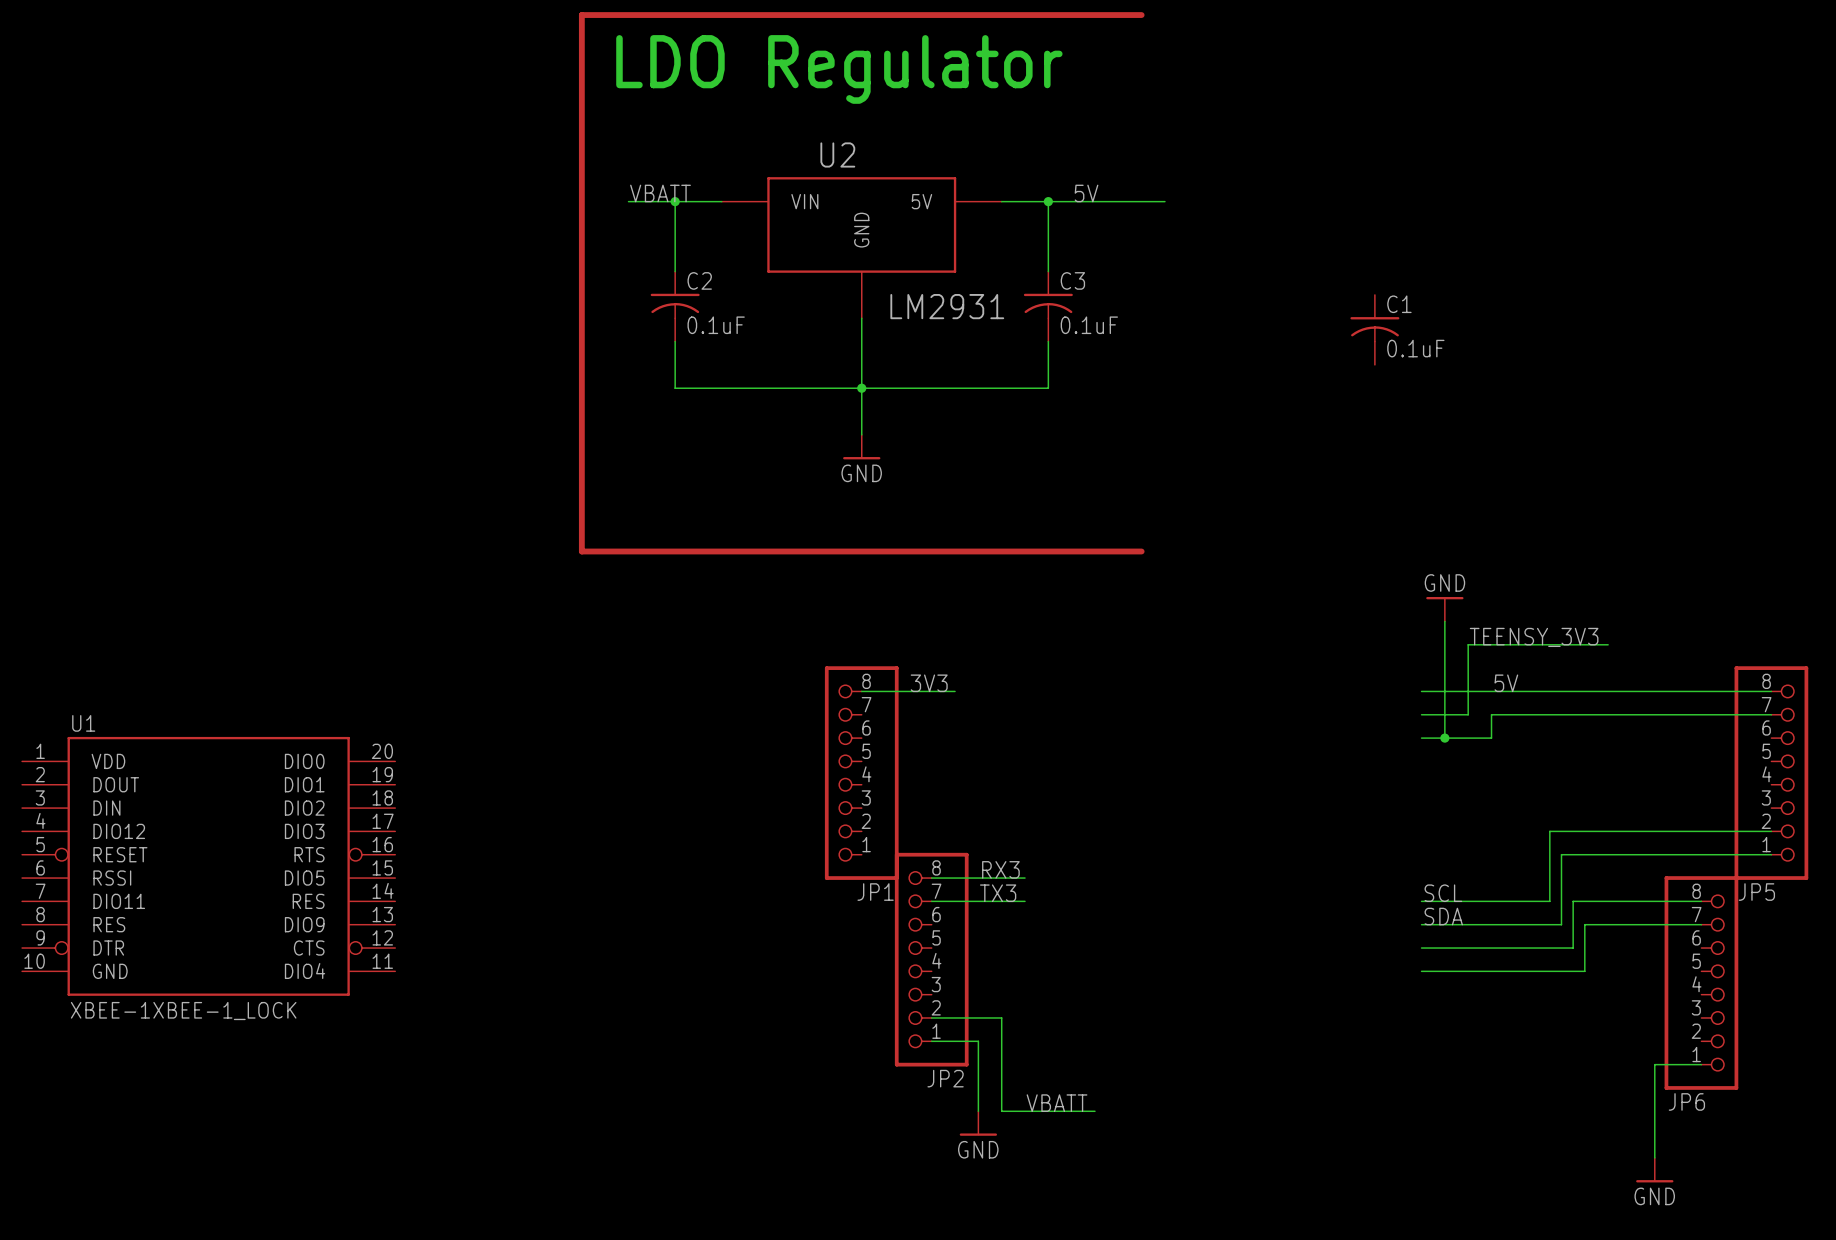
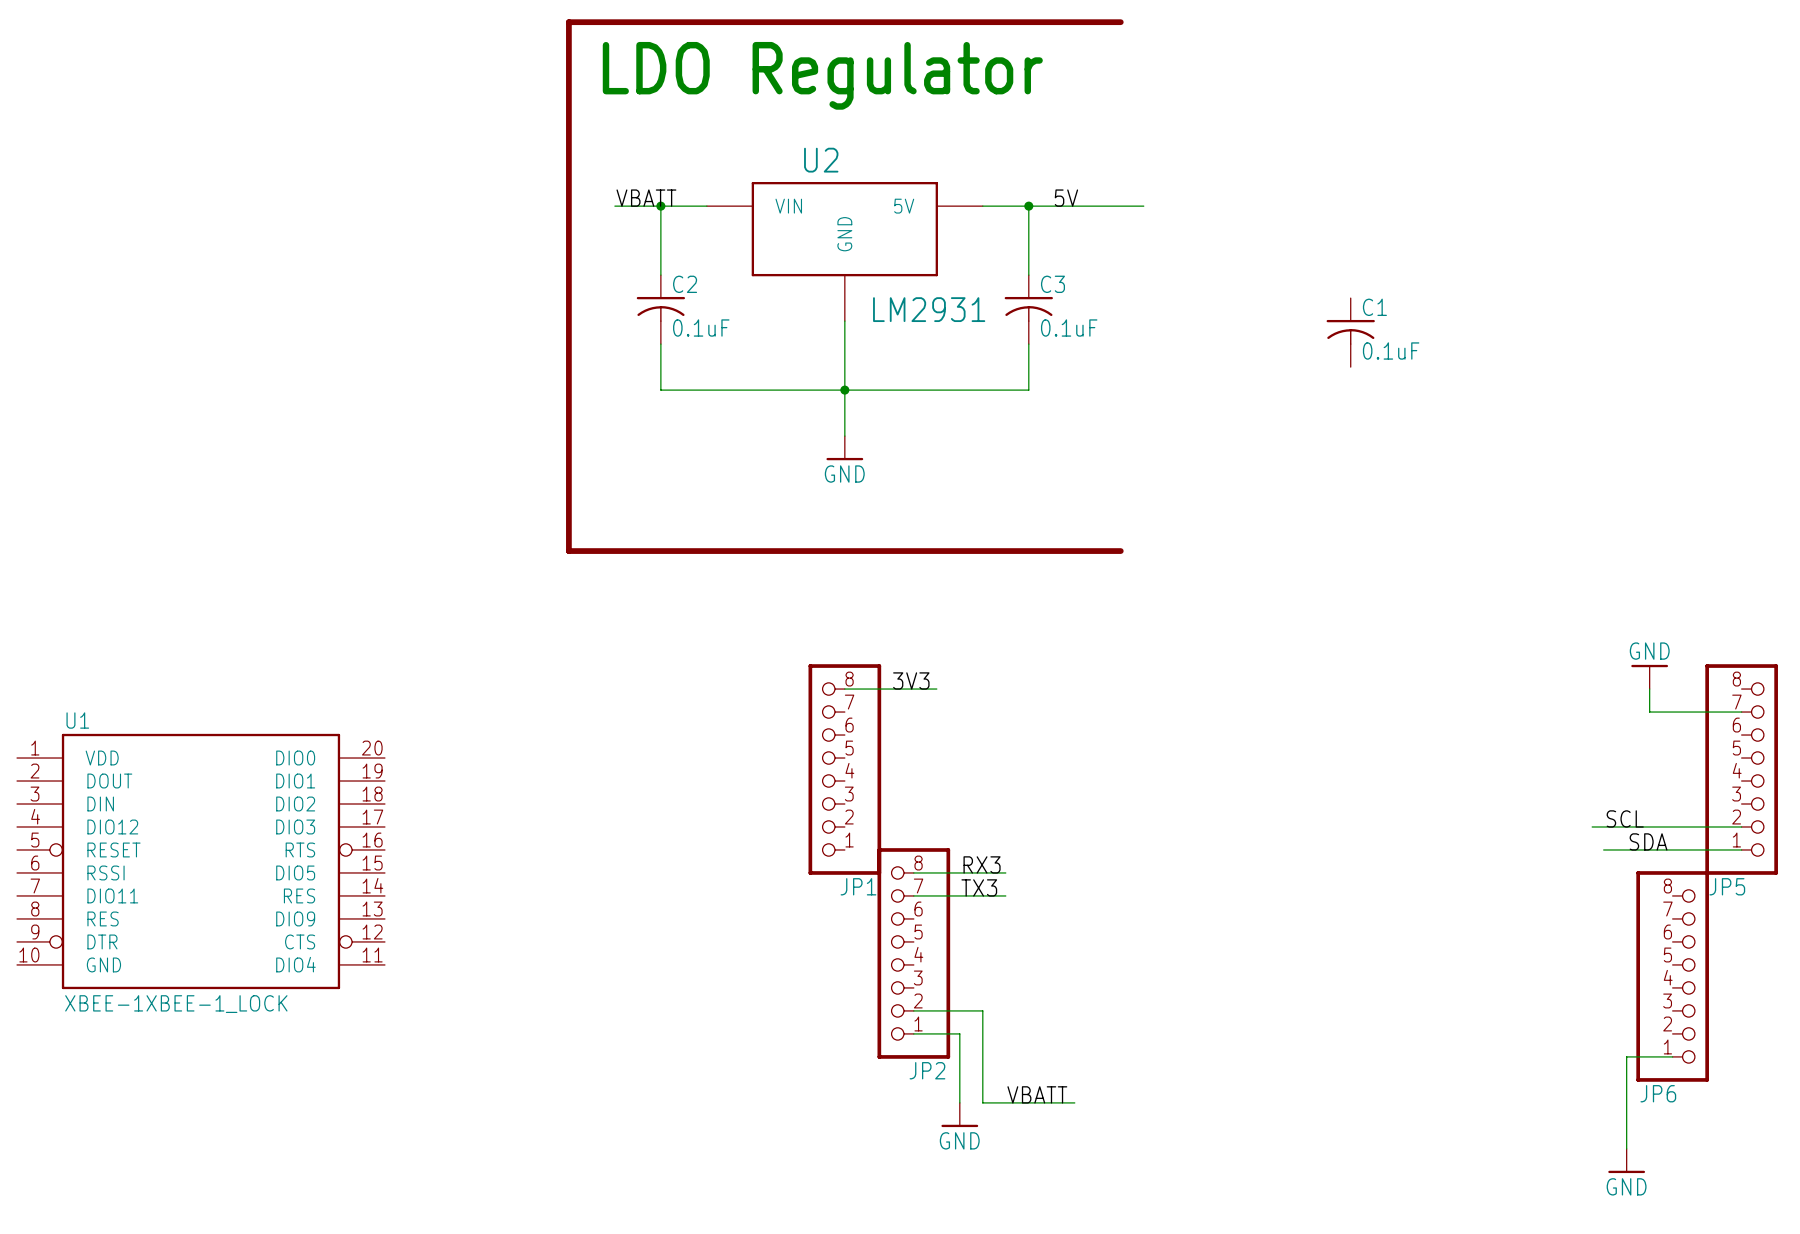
power symbol: GND (1444, 609) -> none
wire: (1444, 621) (1444, 738) -> none
label: TEENSY_3V3 (1534, 637) -> none
wire: (1608, 644) (1468, 644) (1468, 714) (1421, 714) -> none
power symbol: none -> GND (1649, 676)
label: 5V (1506, 683) -> none
wire: (1421, 691) (1771, 691) -> none
wire: (1678, 714) (1491, 714) (1491, 738) (1421, 738) -> (1649, 712) (1649, 689)
junction: (1444, 738) -> none
wire: (1619, 831) (1549, 831) (1549, 901) (1421, 901) -> none
label: none -> SDA (1648, 841)
wire: (1631, 854) (1561, 854) (1561, 924) (1421, 924) -> none
label position: SCL (1443, 893) -> SCL (1625, 818)
wire: (1701, 901) (1573, 901) (1573, 948) (1421, 948) -> none
label: SDA (1443, 916) -> none
wire: (1701, 924) (1584, 924) (1584, 971) (1421, 971) -> none

